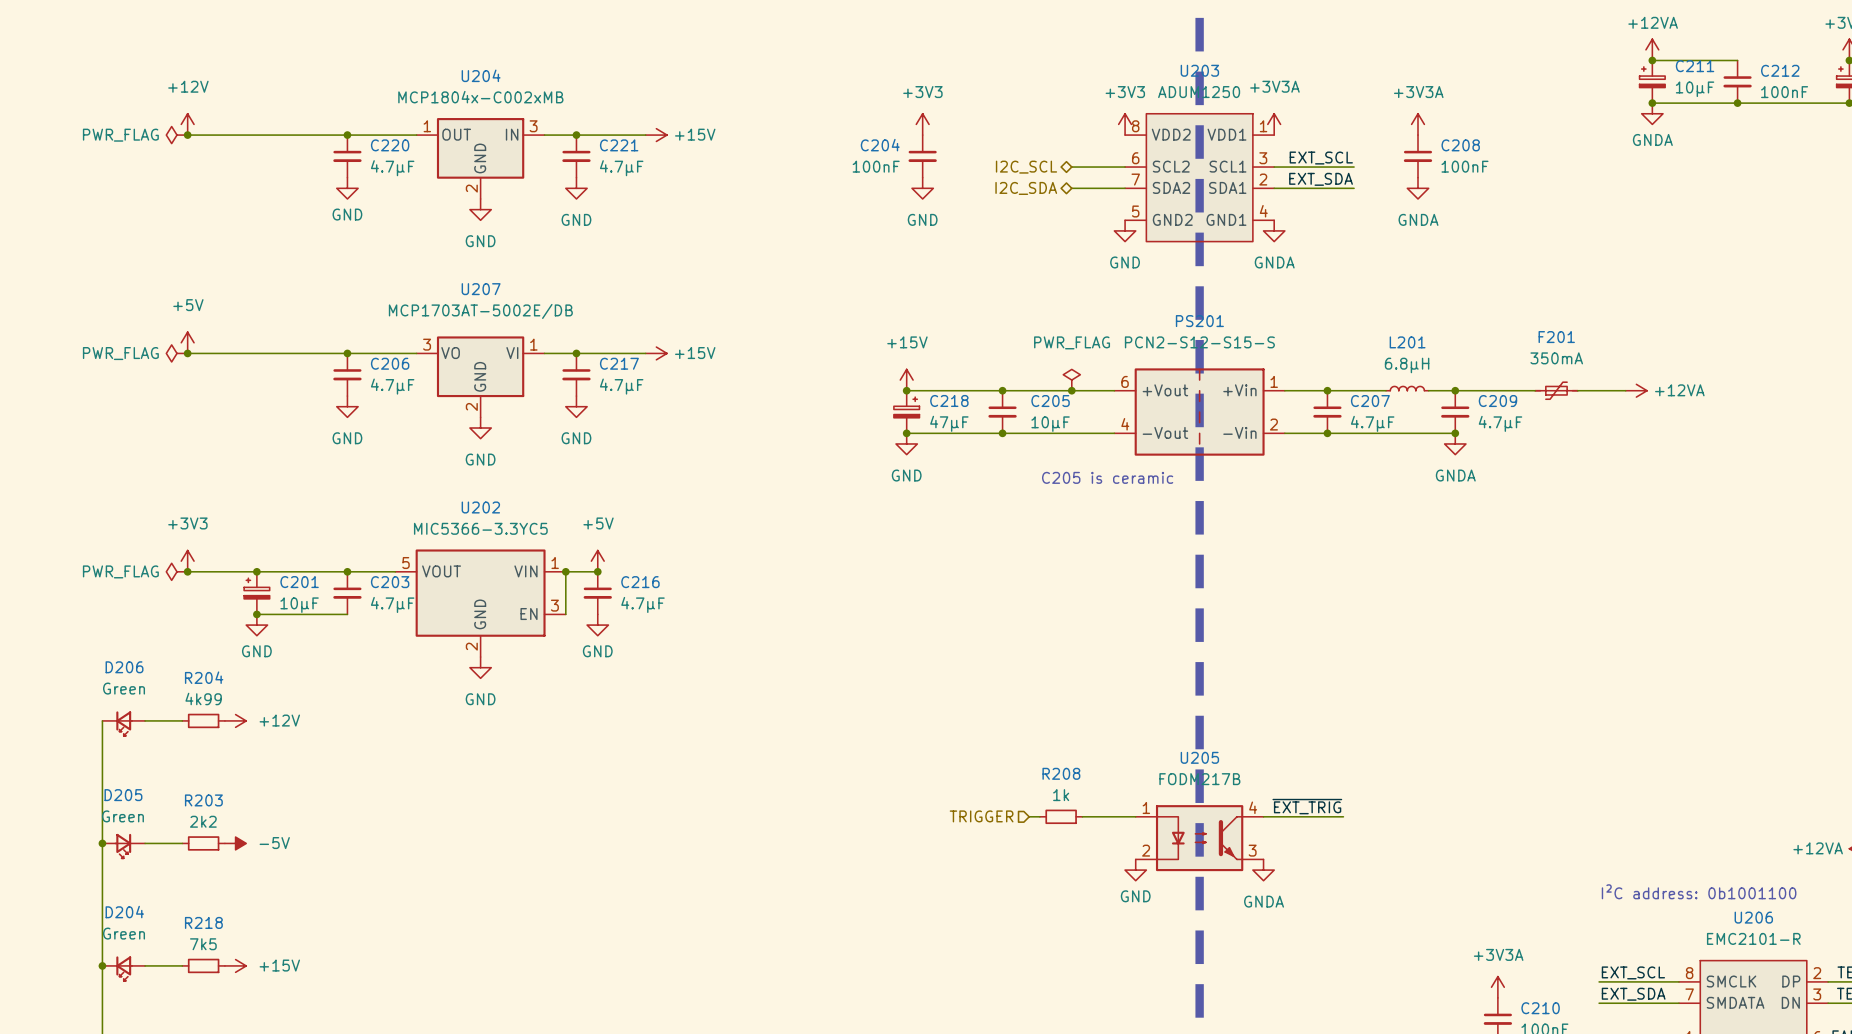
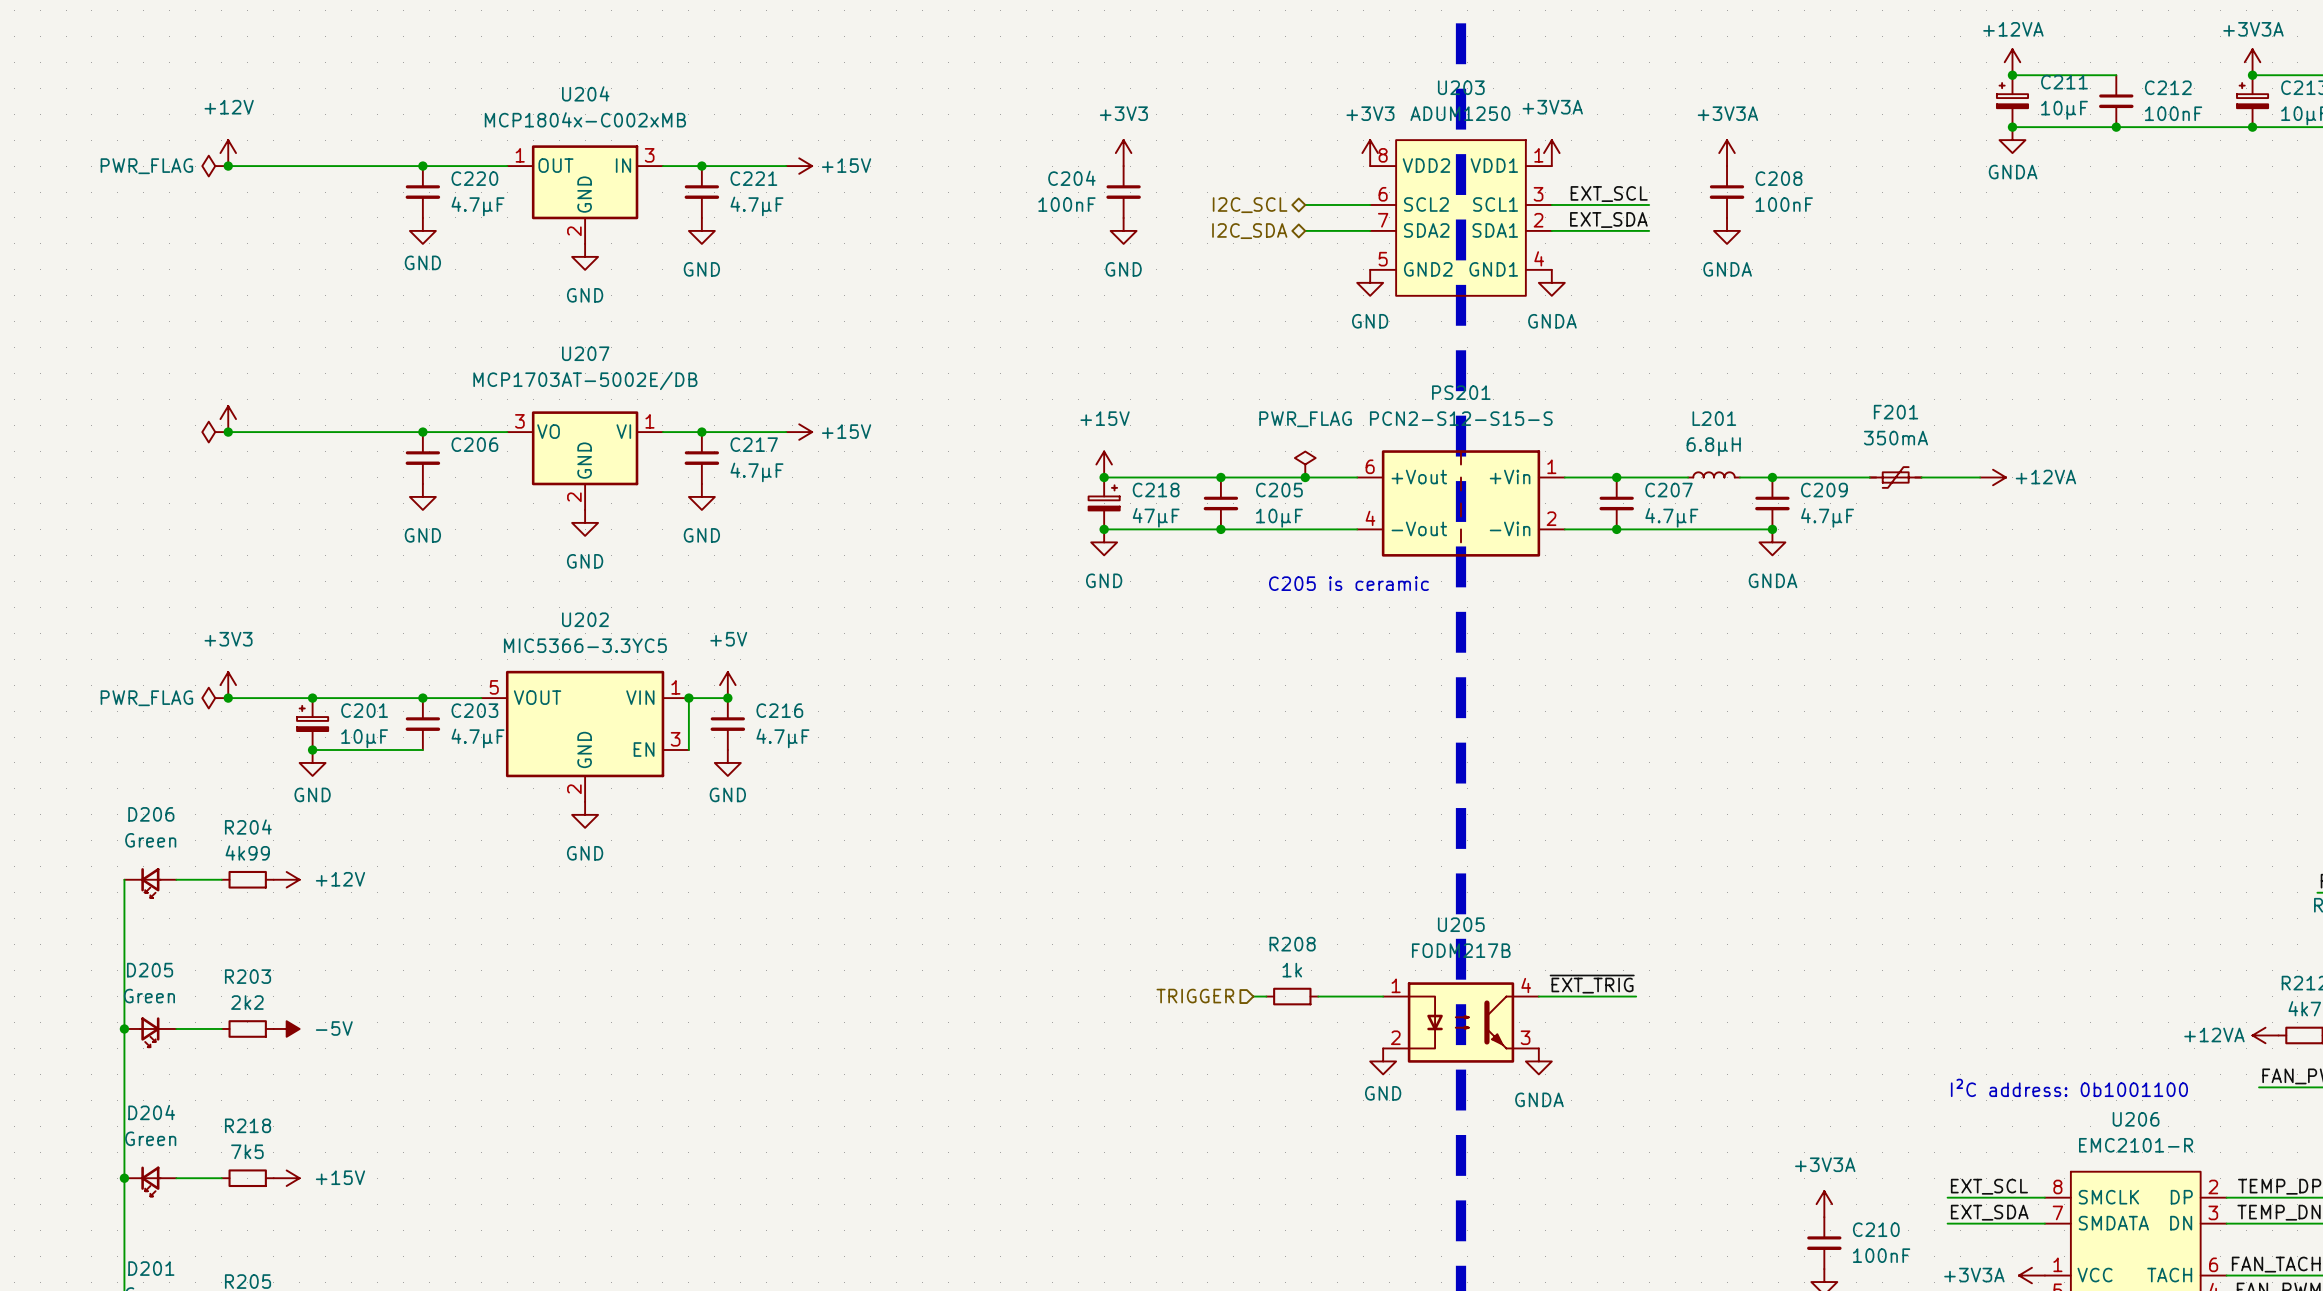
power symbol text: +5V (188, 305) -> none
power symbol text: PWR_FLAG (120, 353) -> none
C206 value: 4.7µF (392, 386) -> none

